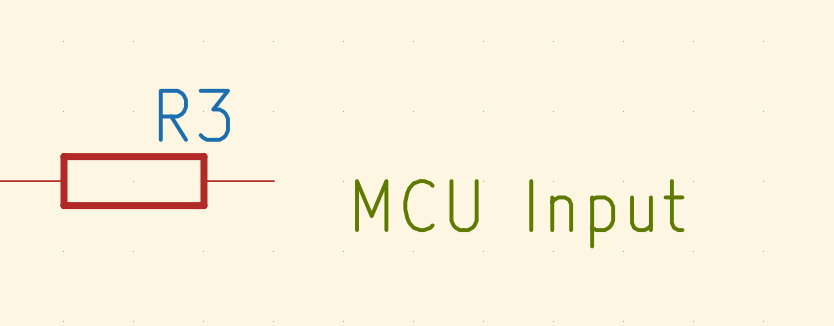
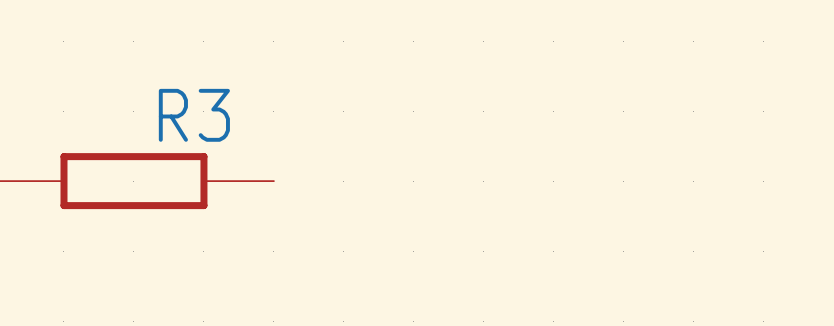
text: MCU Input (519, 213) -> none

